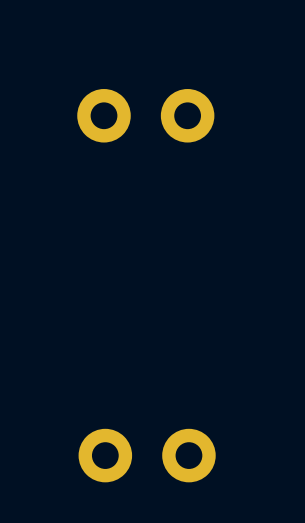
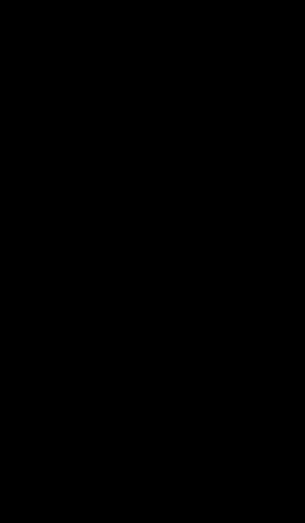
part: (145, 115) -> none
part: (147, 455) -> none

